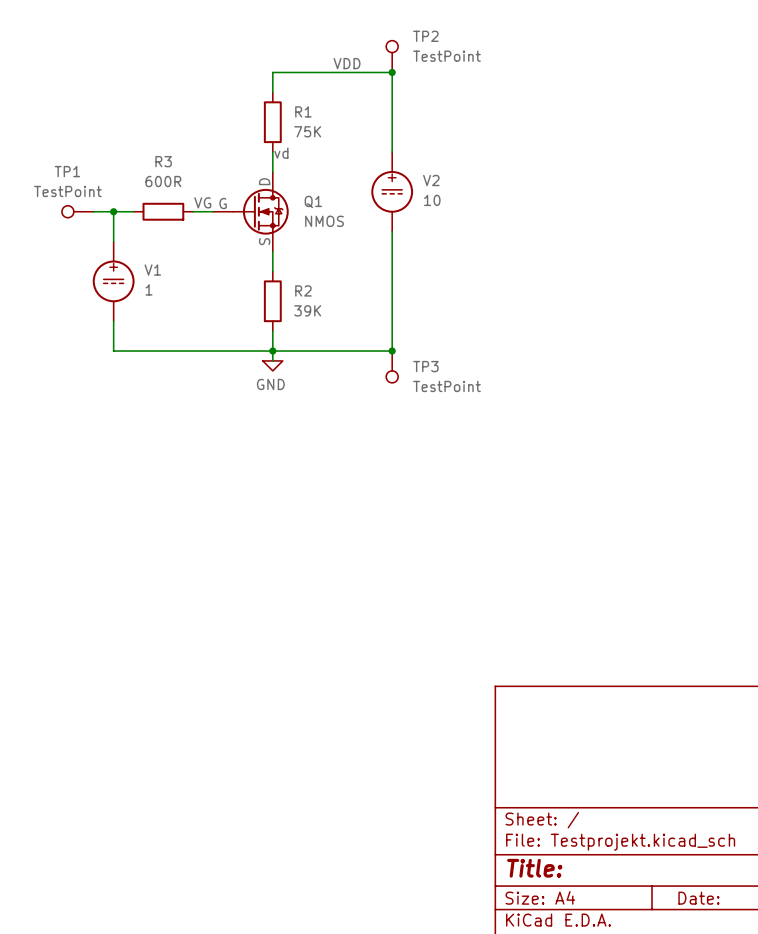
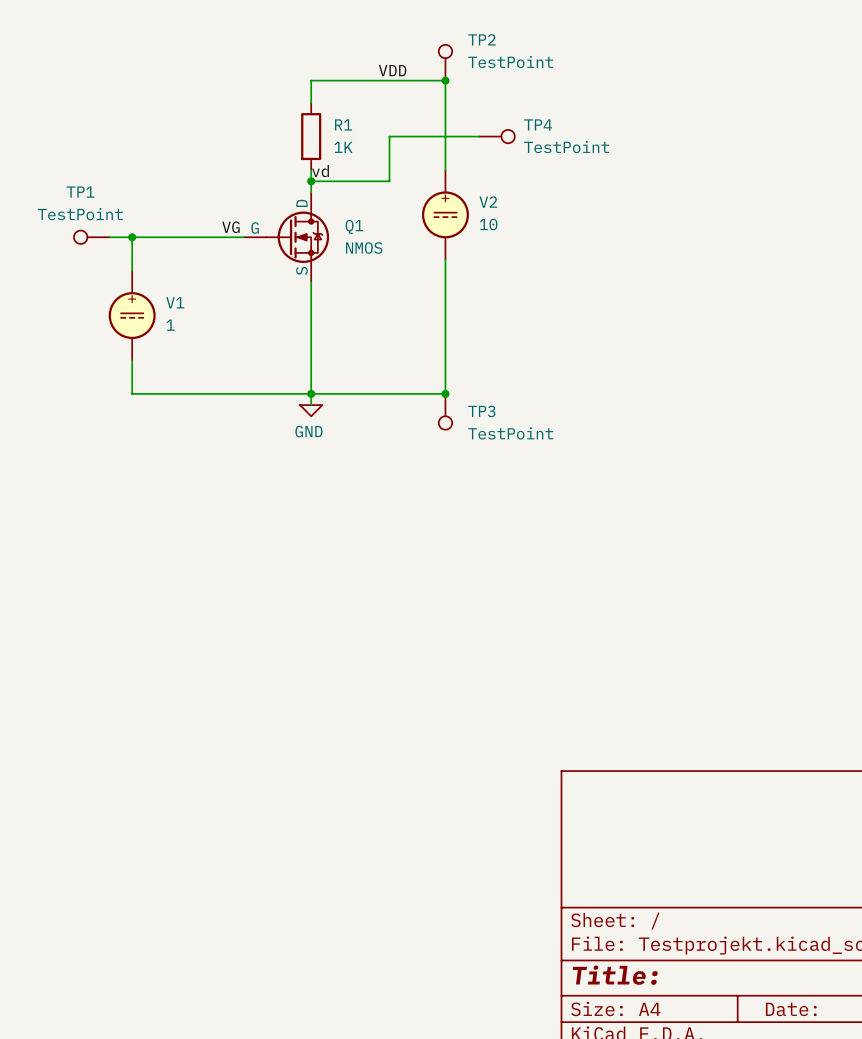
wire: none -> (479, 136) (389, 136) (389, 181) (311, 181)
TP4: none -> TestPoint (496, 136)
R1 value: 75K (307, 131) -> 1K (343, 147)
junction: none -> (311, 181)
wire: none -> (154, 237) (221, 237)
R3: 600R (163, 211) -> none
wire: none -> (311, 304) (311, 371)
R2: 39K (272, 301) -> none

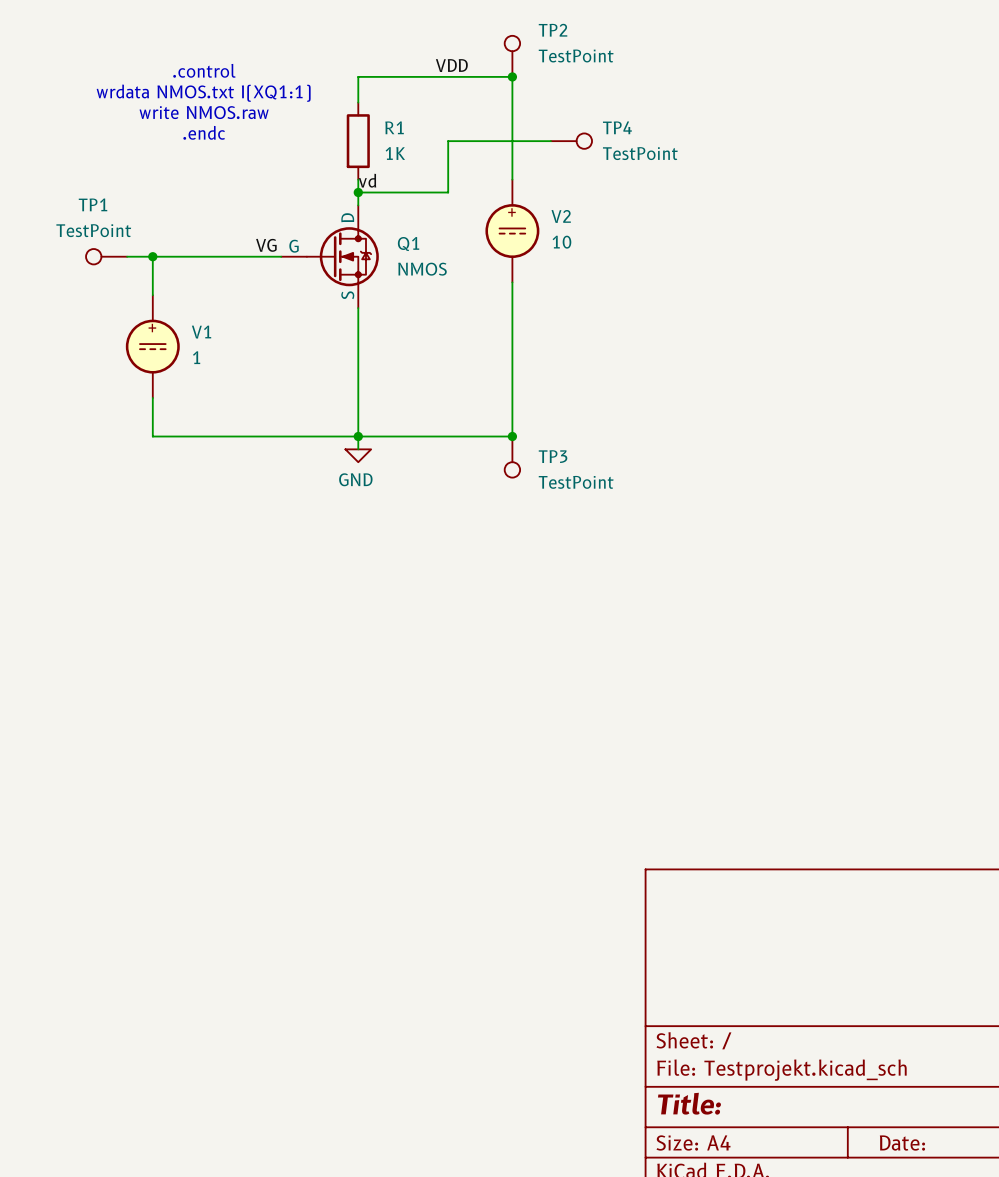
text: none -> .control (204, 70)
text: none -> wrdata NMOS.txt I(XQ1:1) (203, 93)
text: none -> write NMOS.raw (204, 112)
text: none -> .endc (204, 132)

